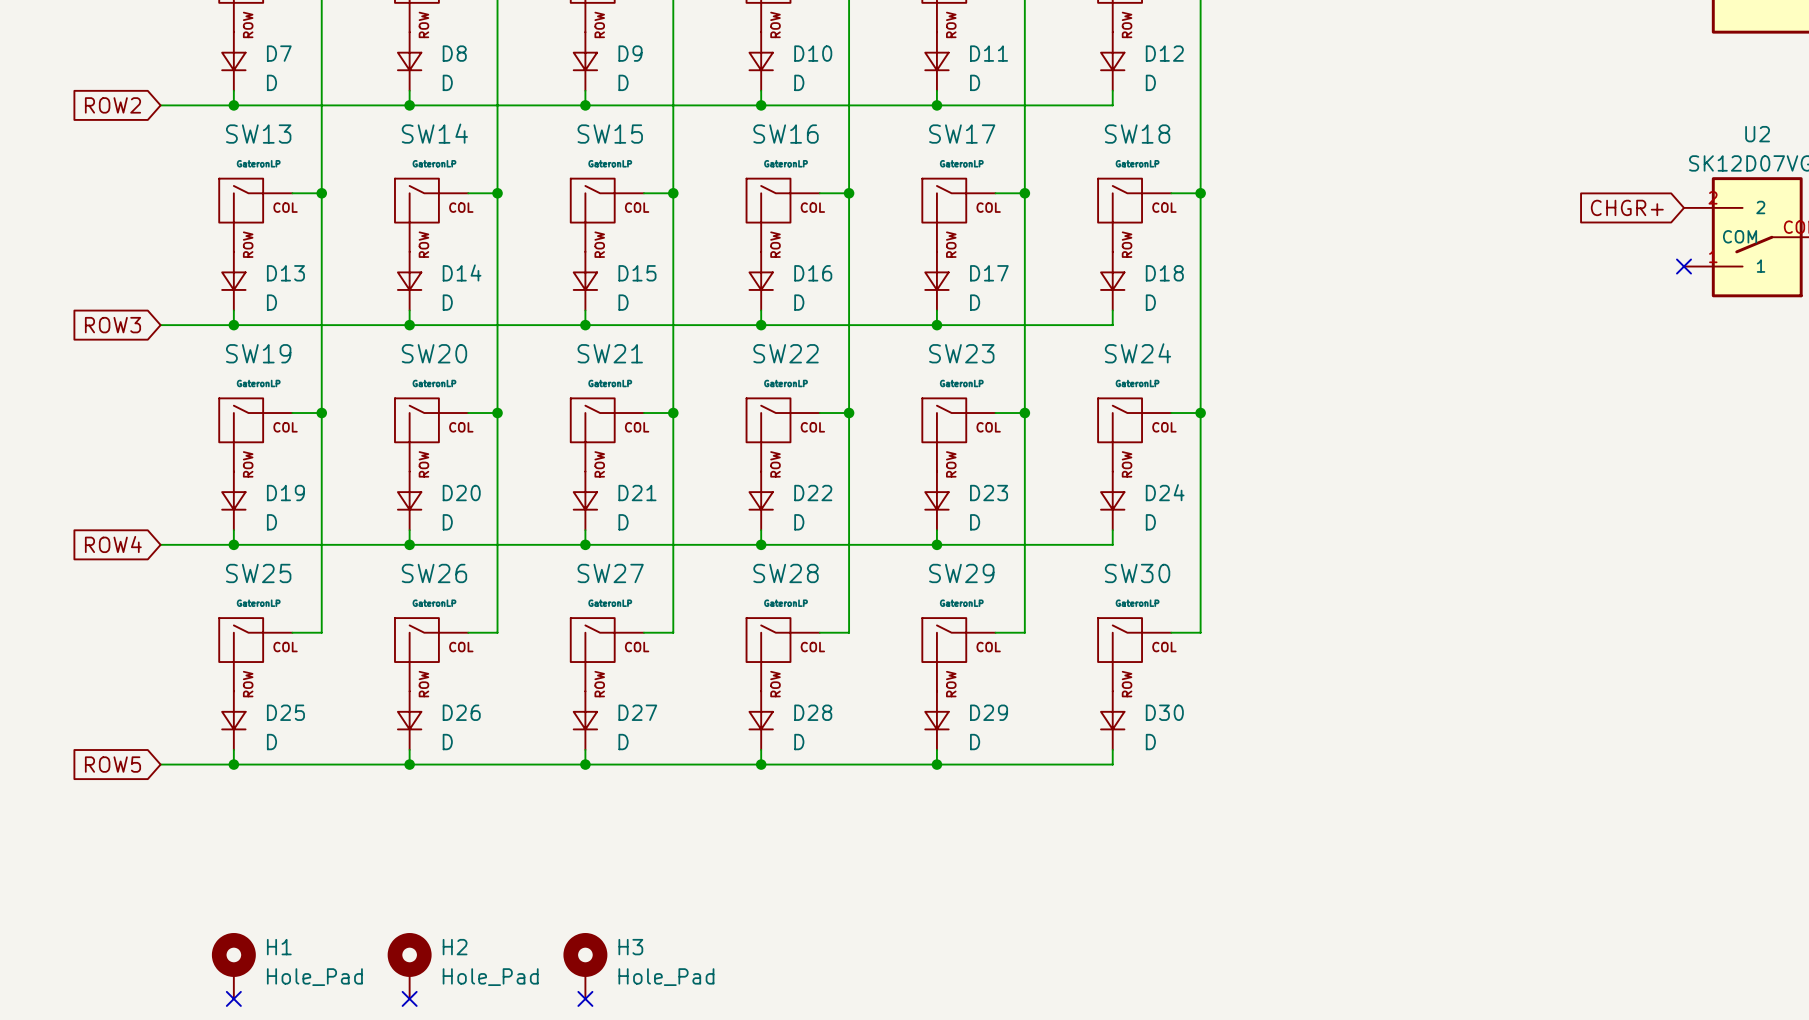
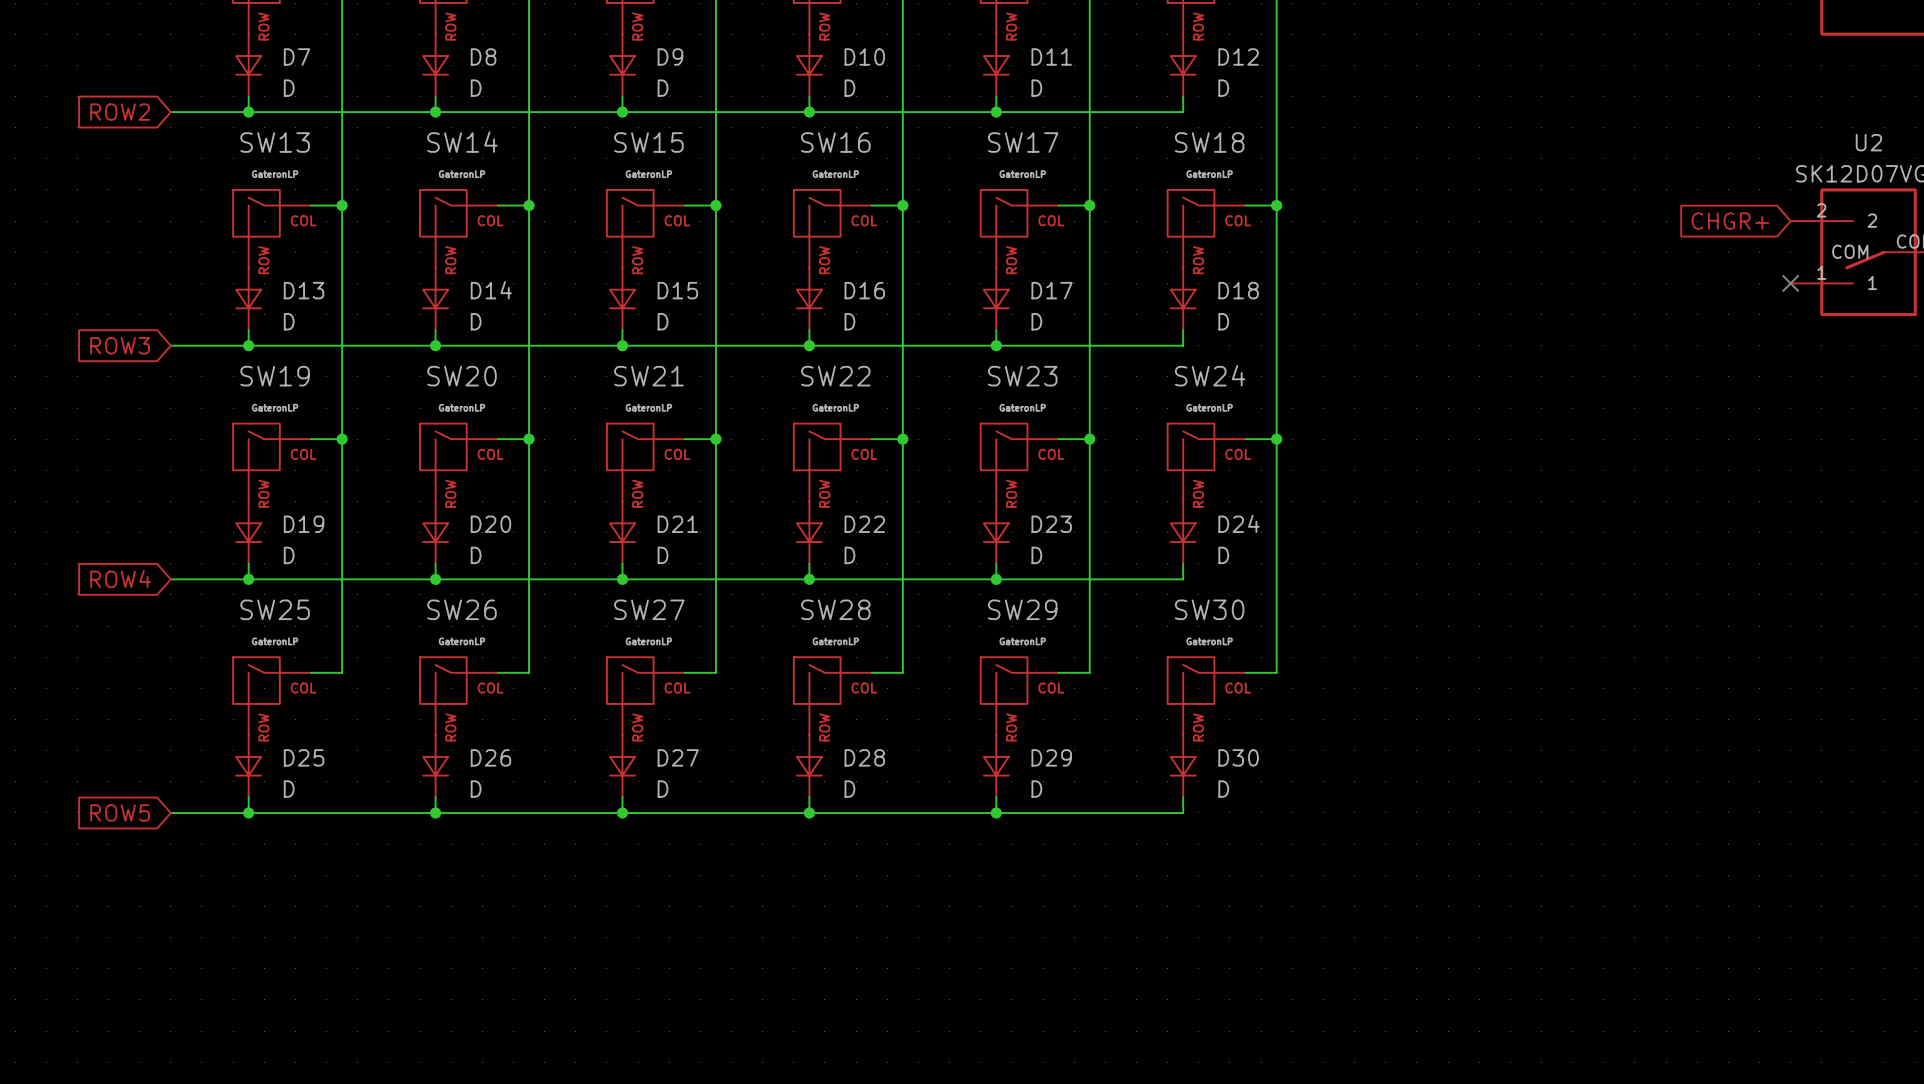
H1: Hole_Pad (233, 965) -> none
H2: Hole_Pad (409, 965) -> none
H3: Hole_Pad (585, 965) -> none
no-connect mark: (233, 998) -> none
no-connect mark: (409, 998) -> none
no-connect mark: (585, 998) -> none

